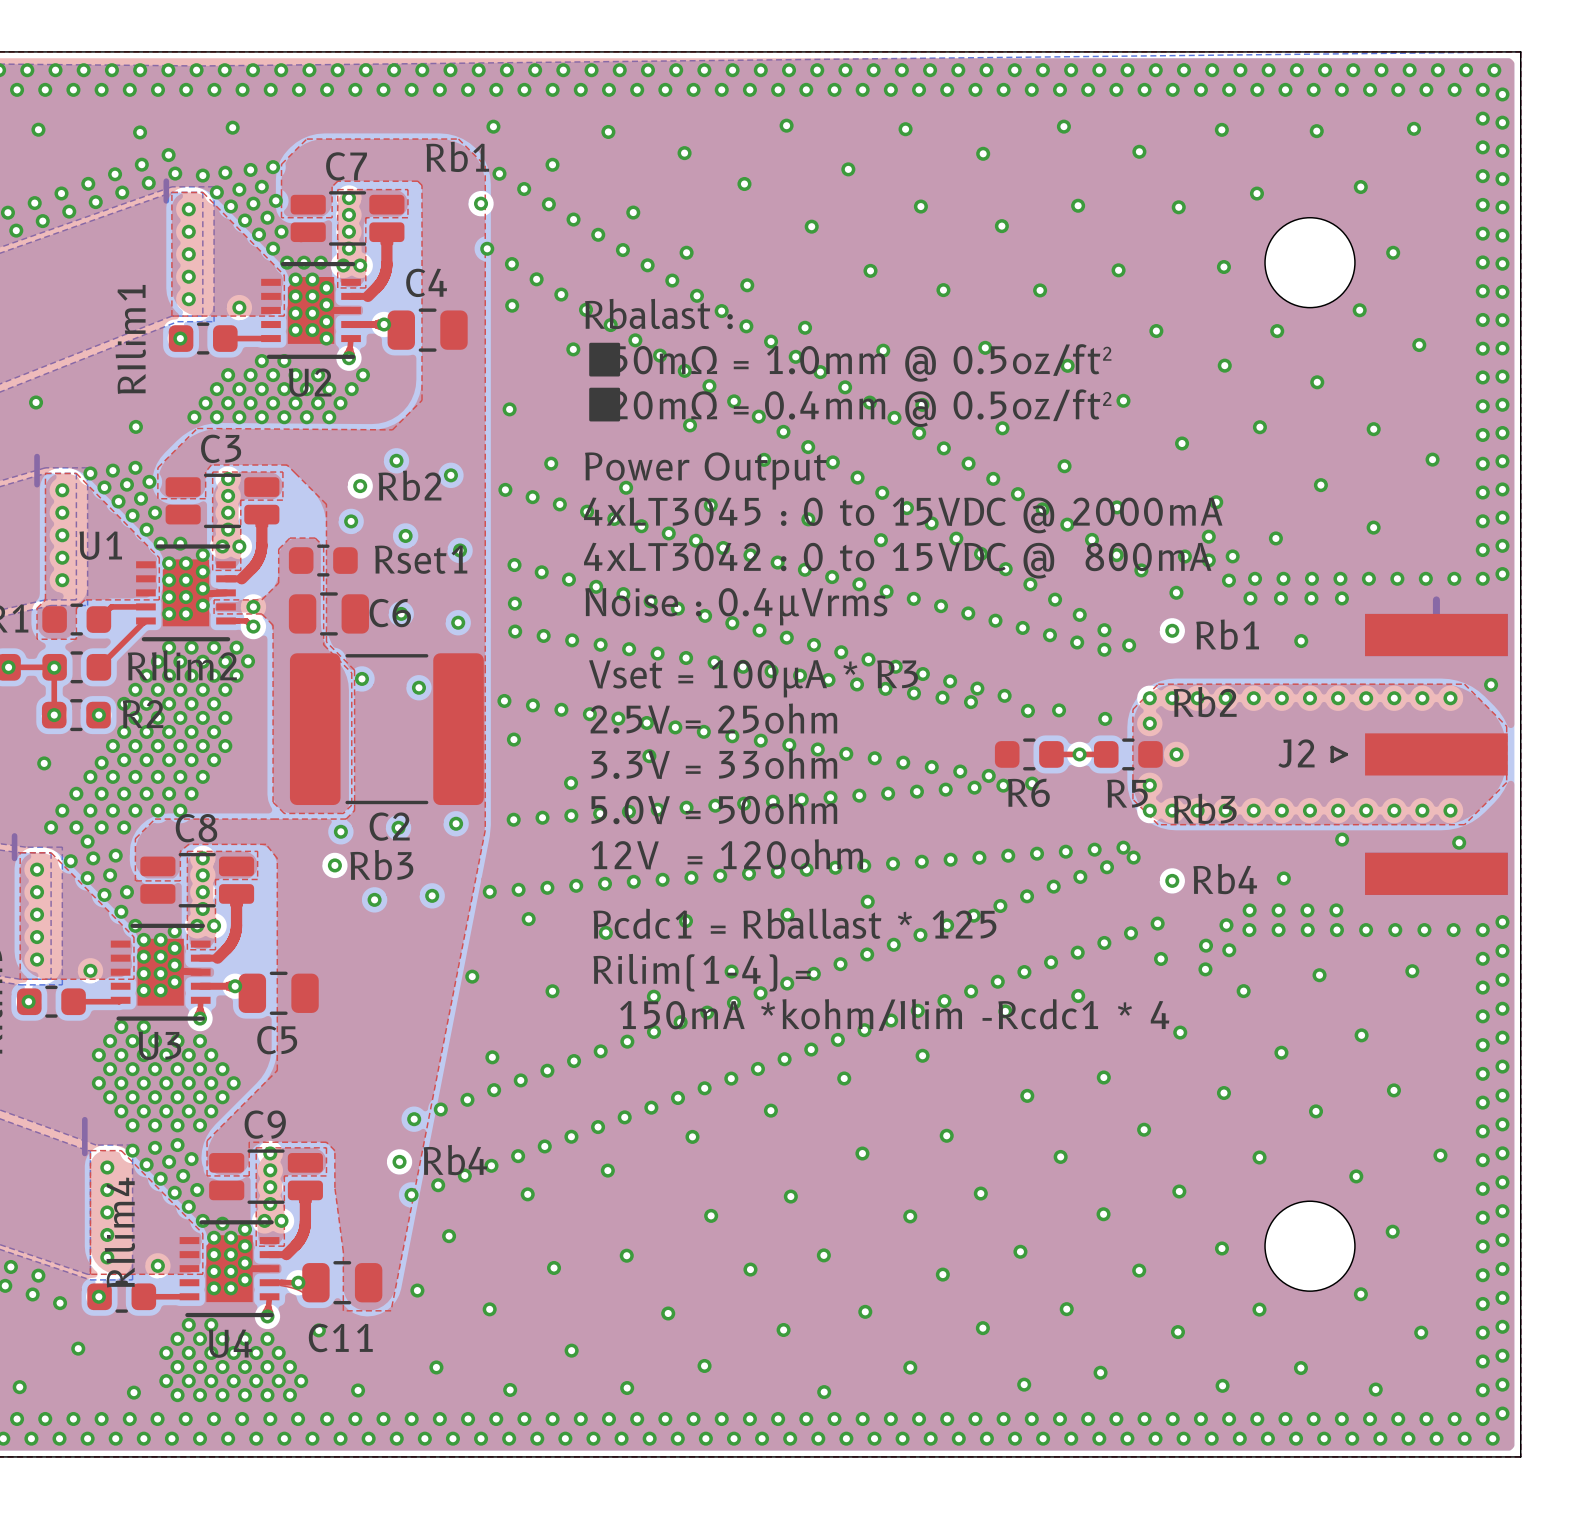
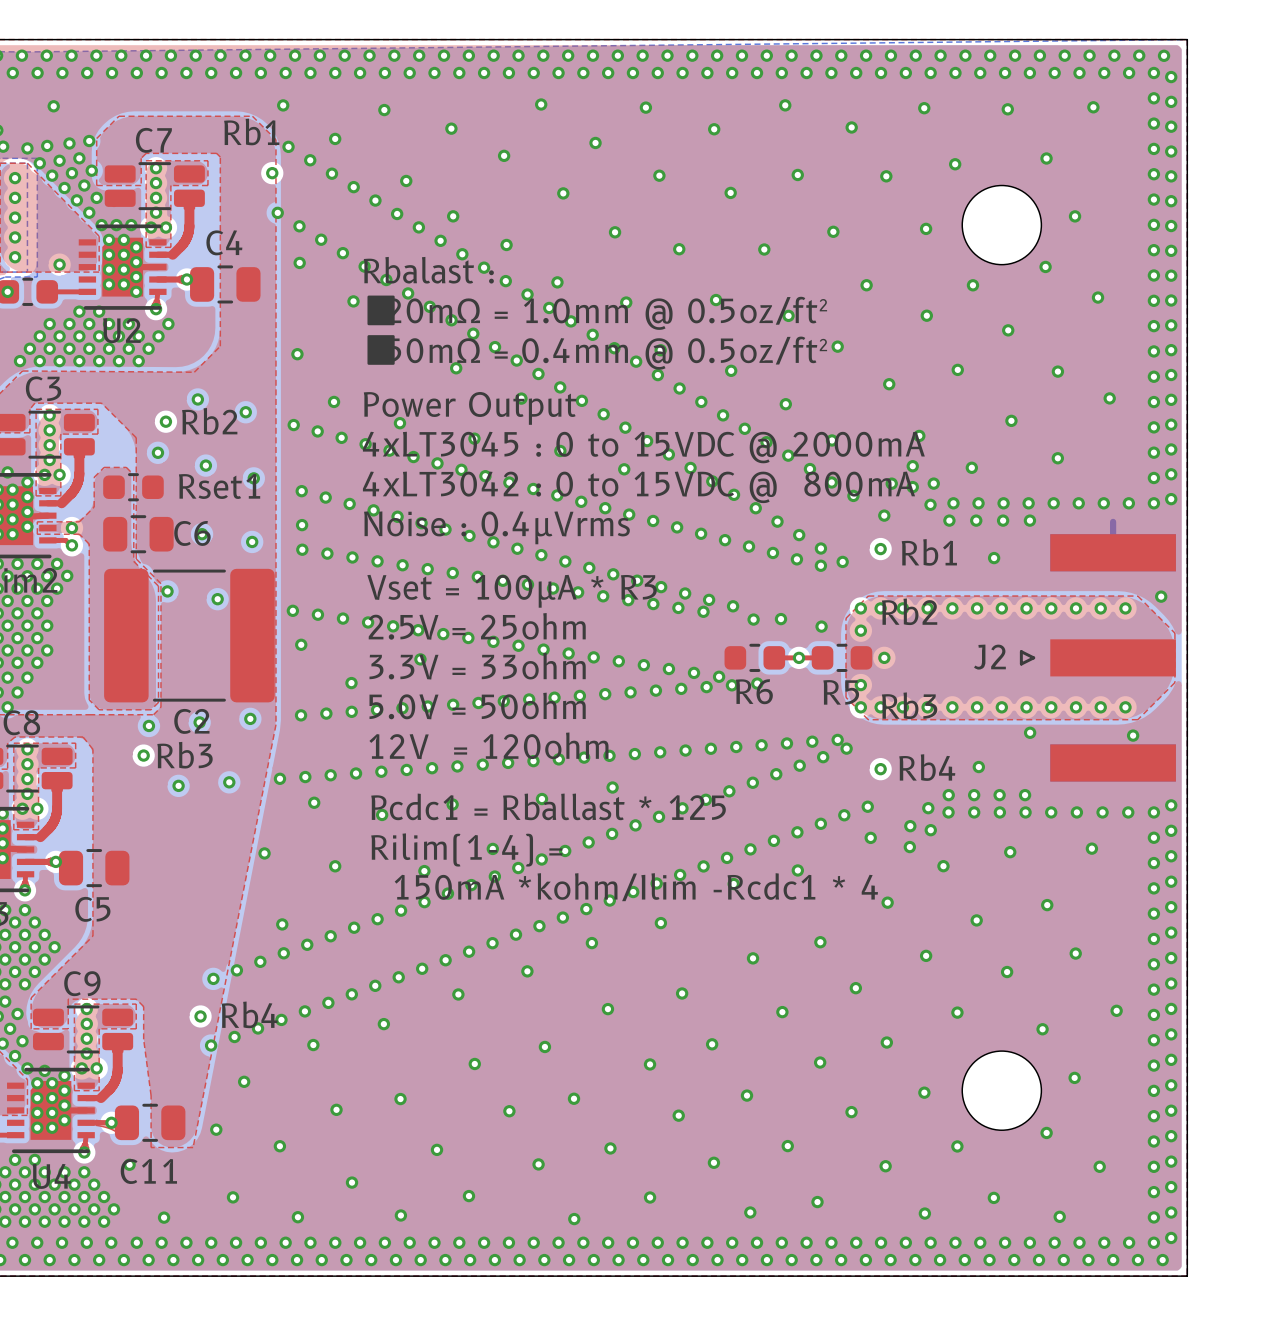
text: 50mΩ = 1.0mm @ 0.5oz/ft² (861, 362) -> 20mΩ = 1.0mm @ 0.5oz/ft² (606, 313)
text: 20mΩ = 0.4mm @ 0.5oz/ft² (861, 408) -> 50mΩ = 0.4mm @ 0.5oz/ft² (607, 353)

